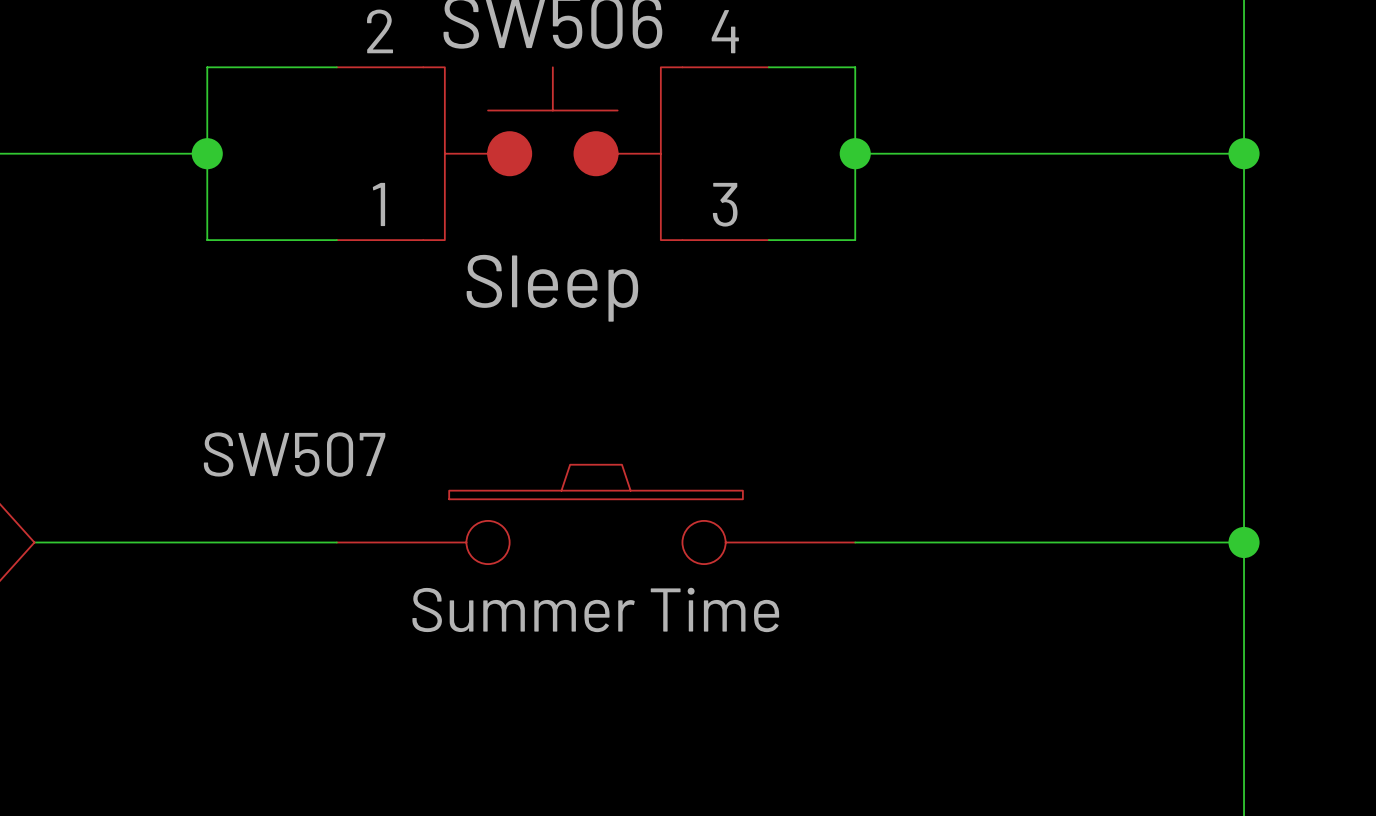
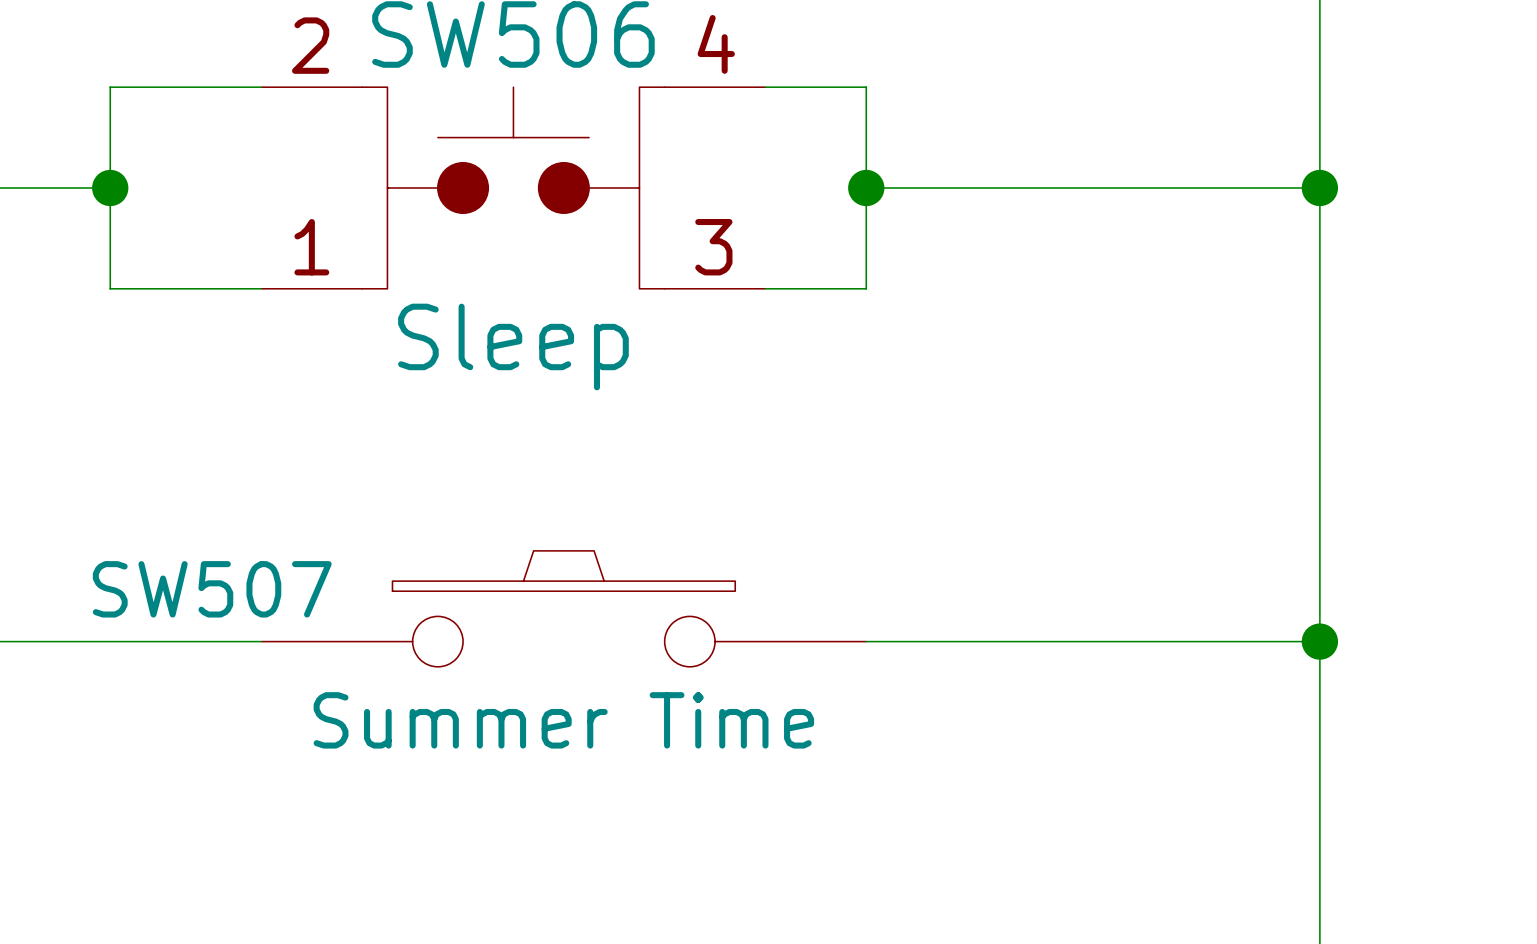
SW507 name position: SW507 (294, 454) -> SW507 (212, 589)

